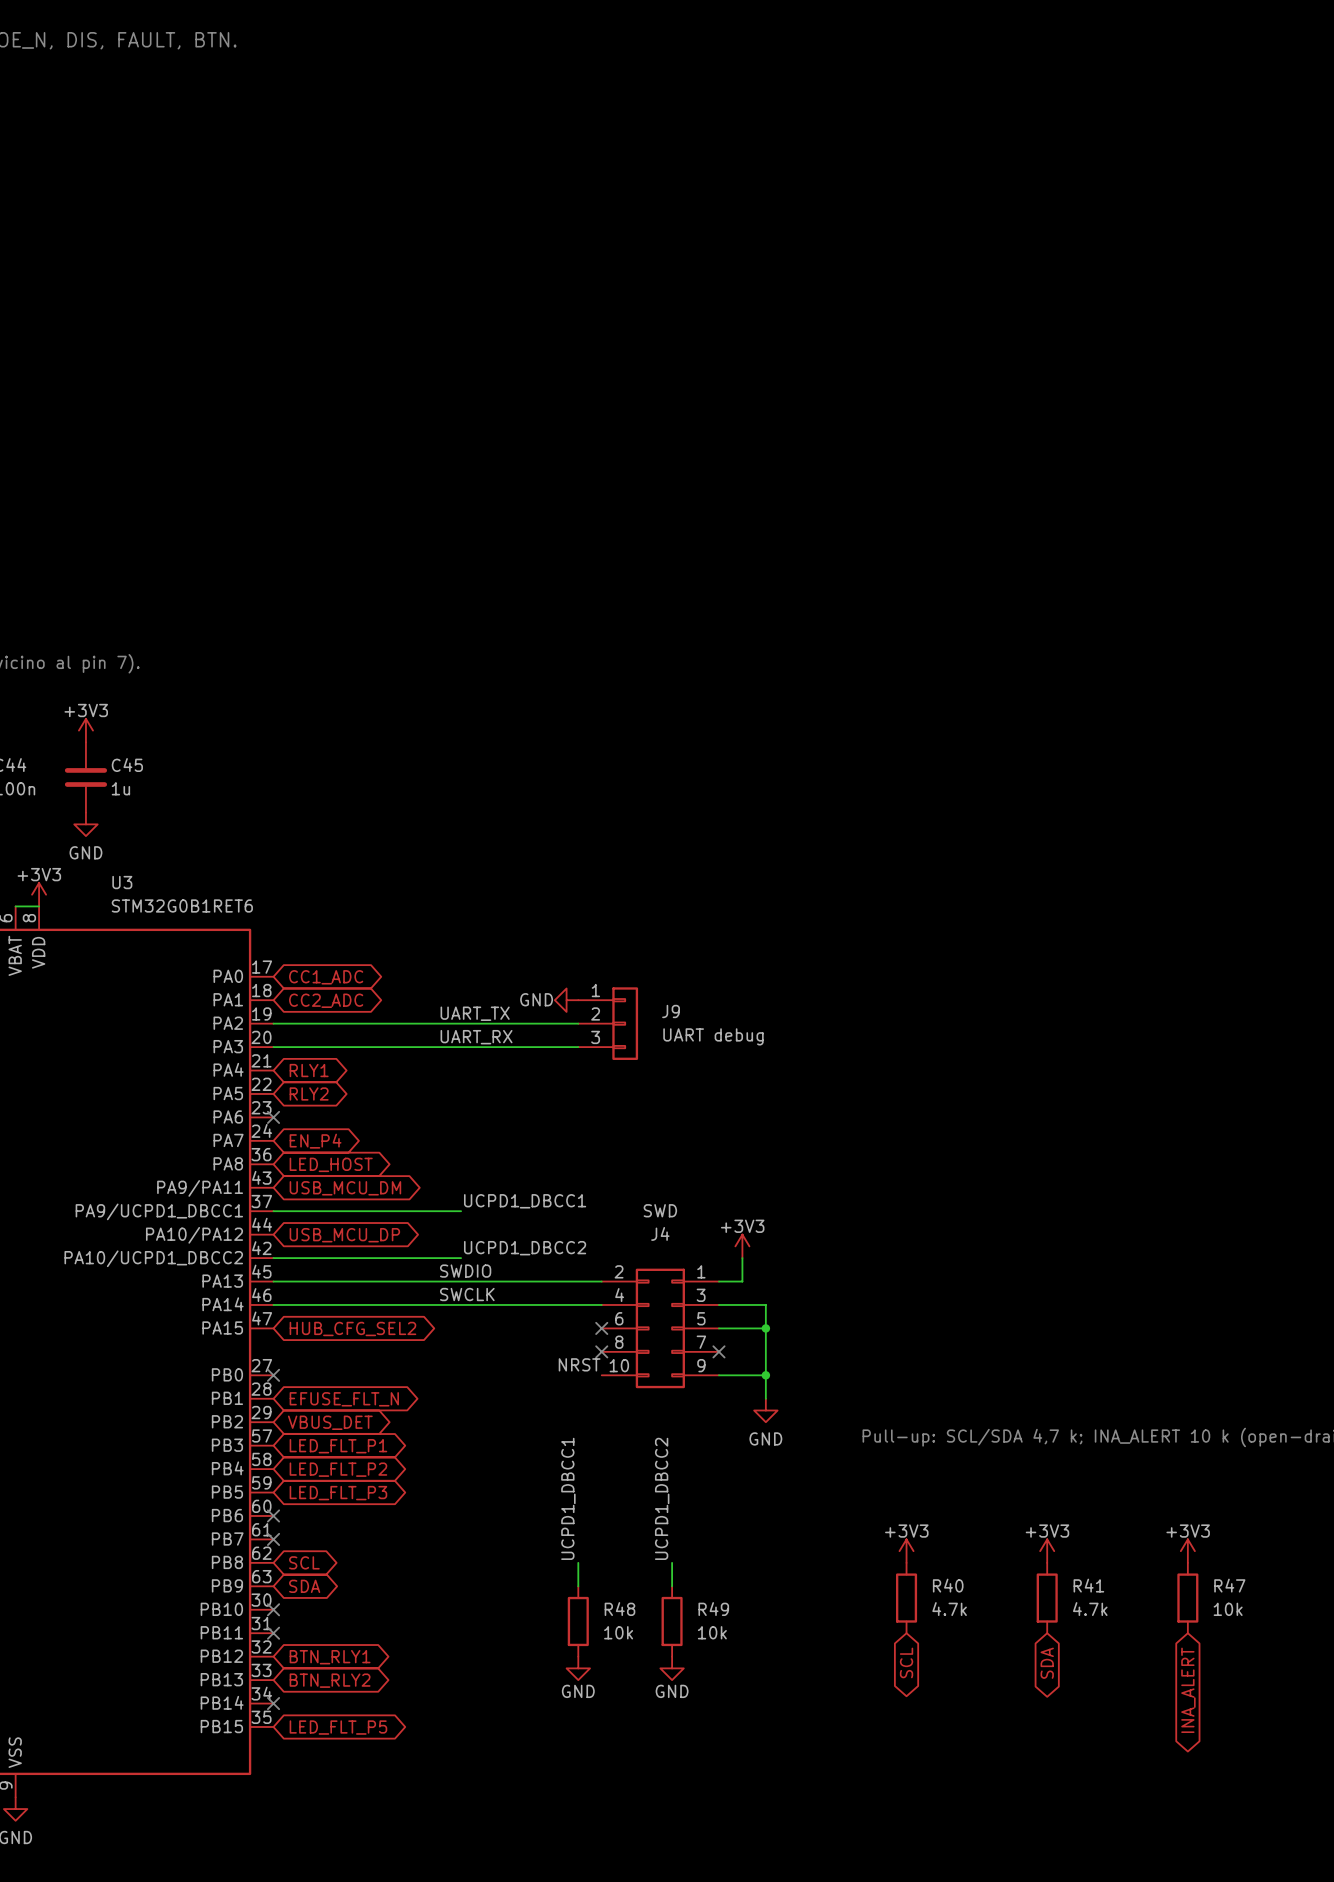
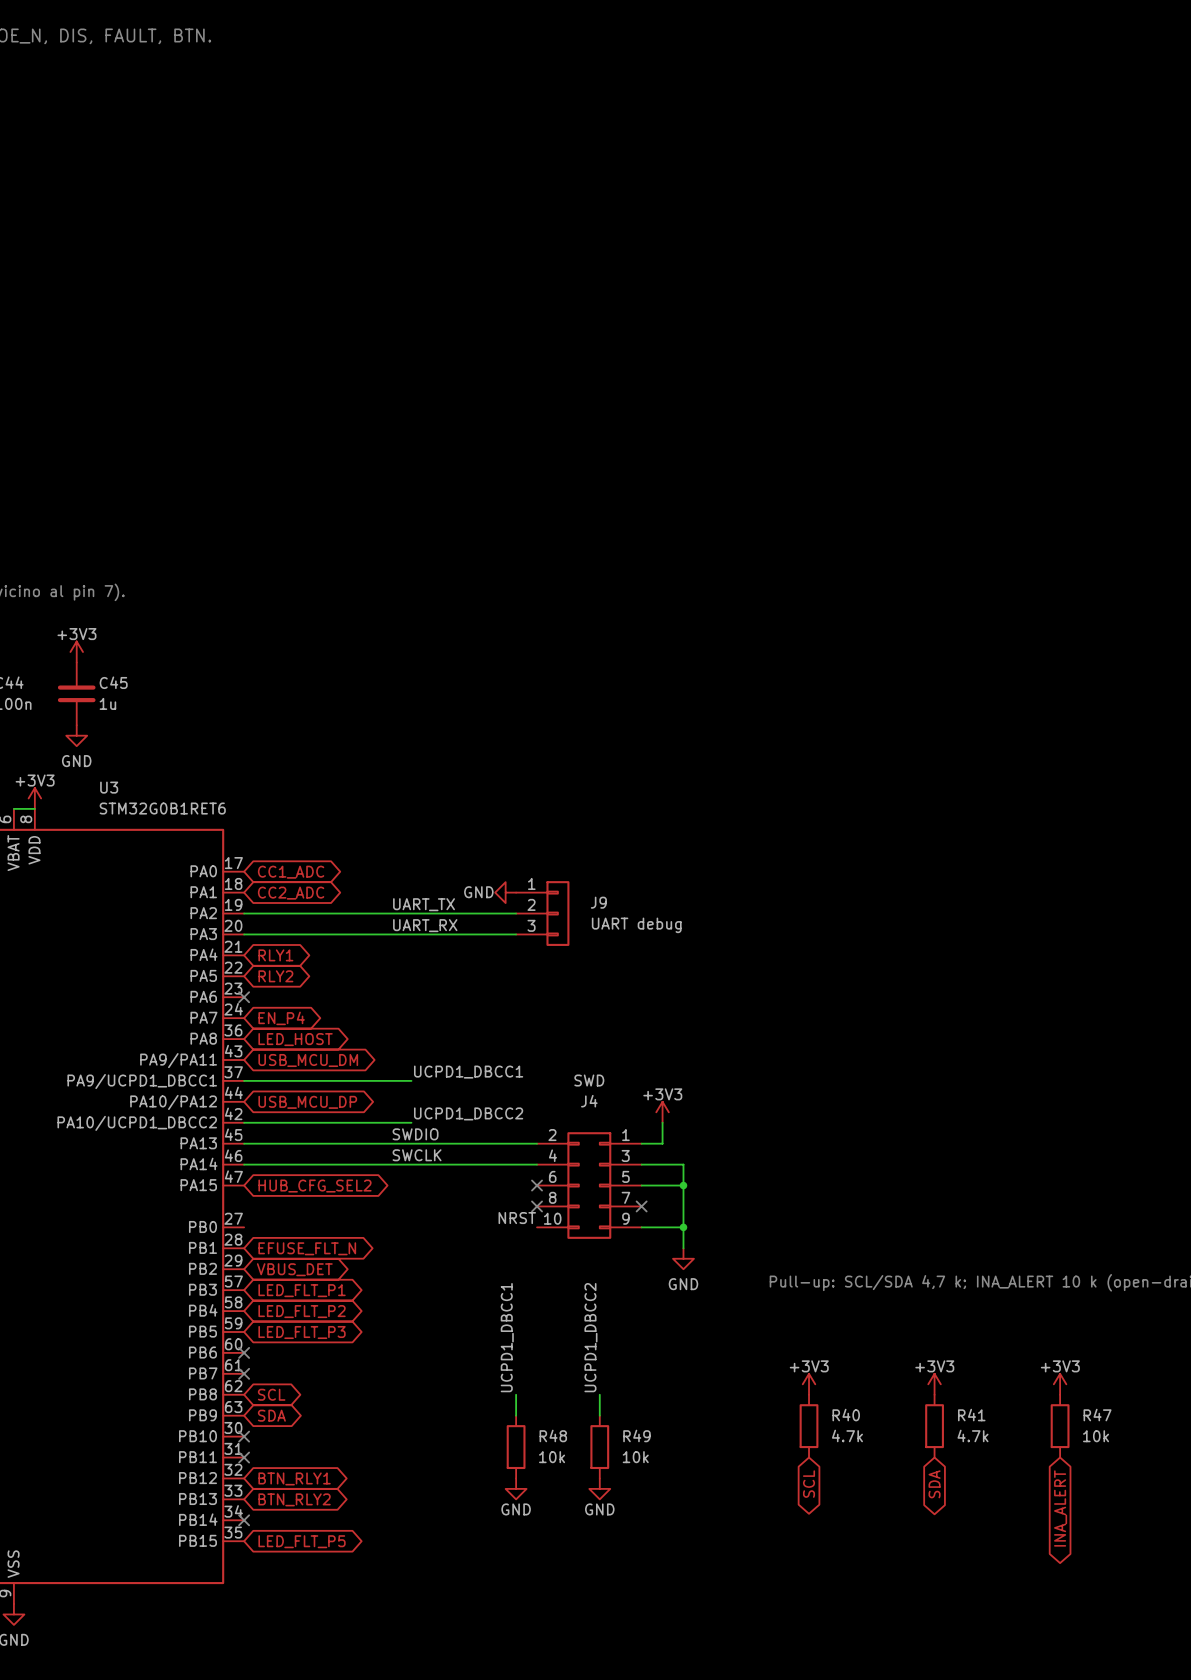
no-connect mark: (273, 1375) -> none

